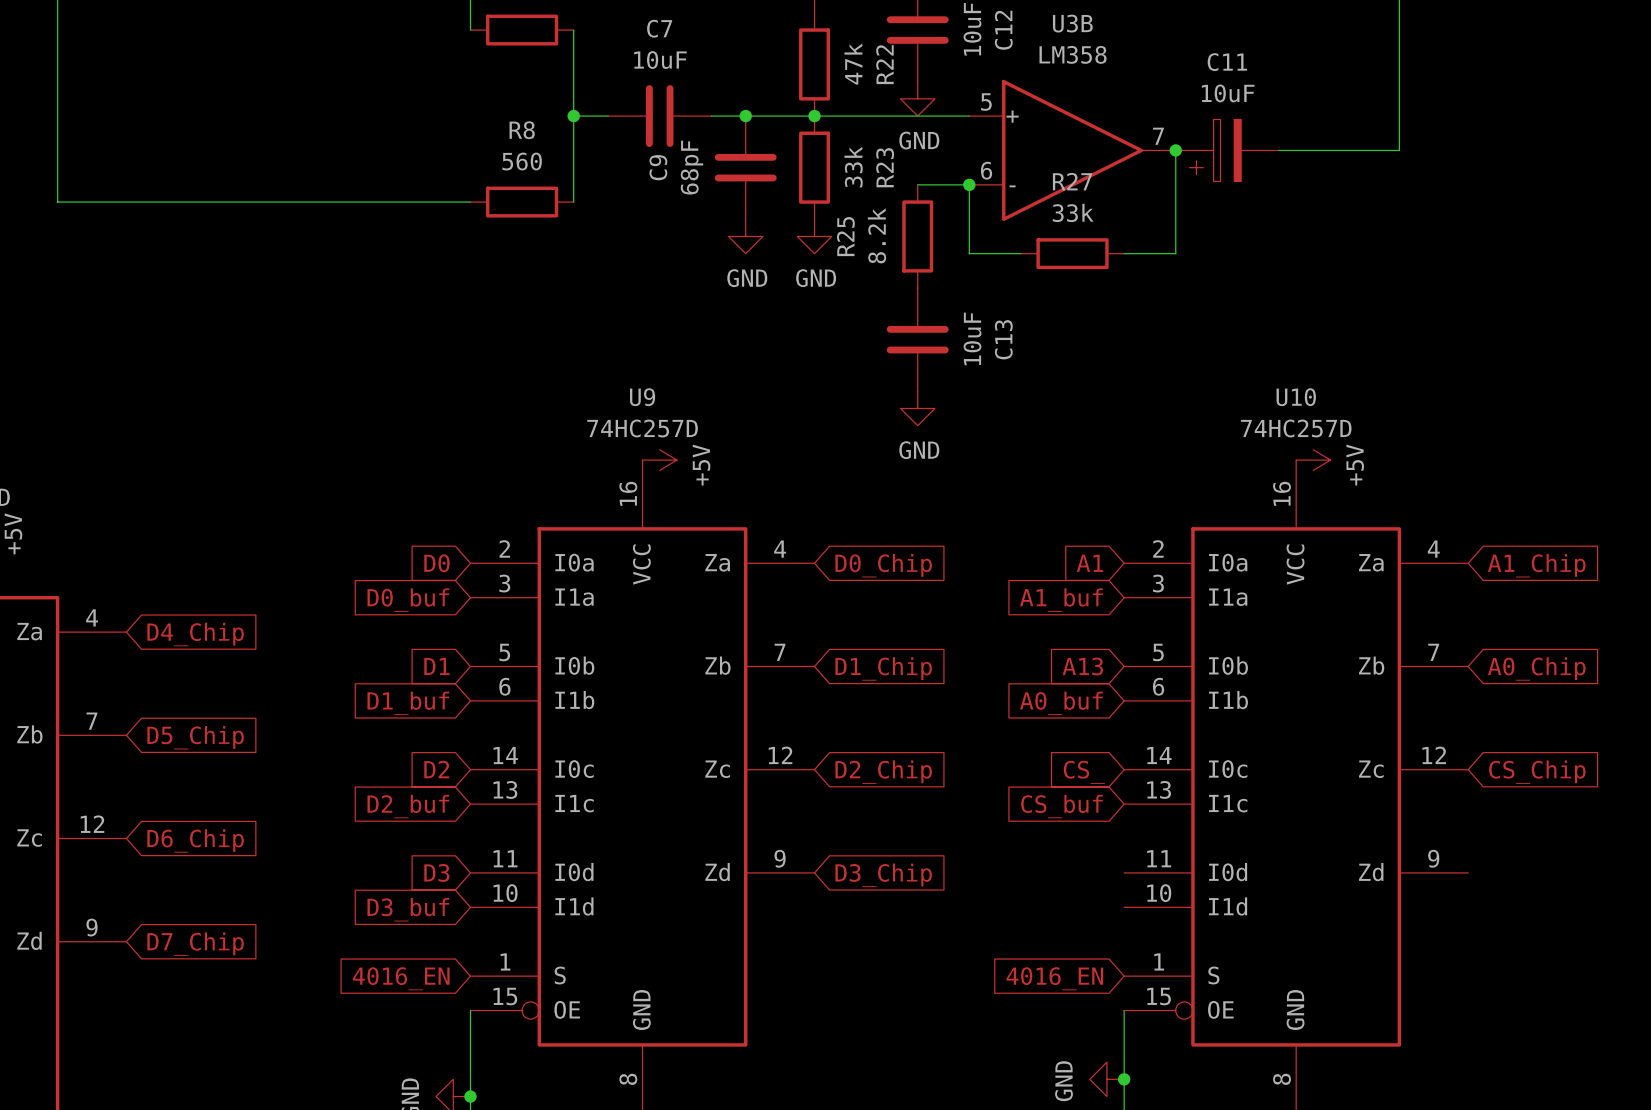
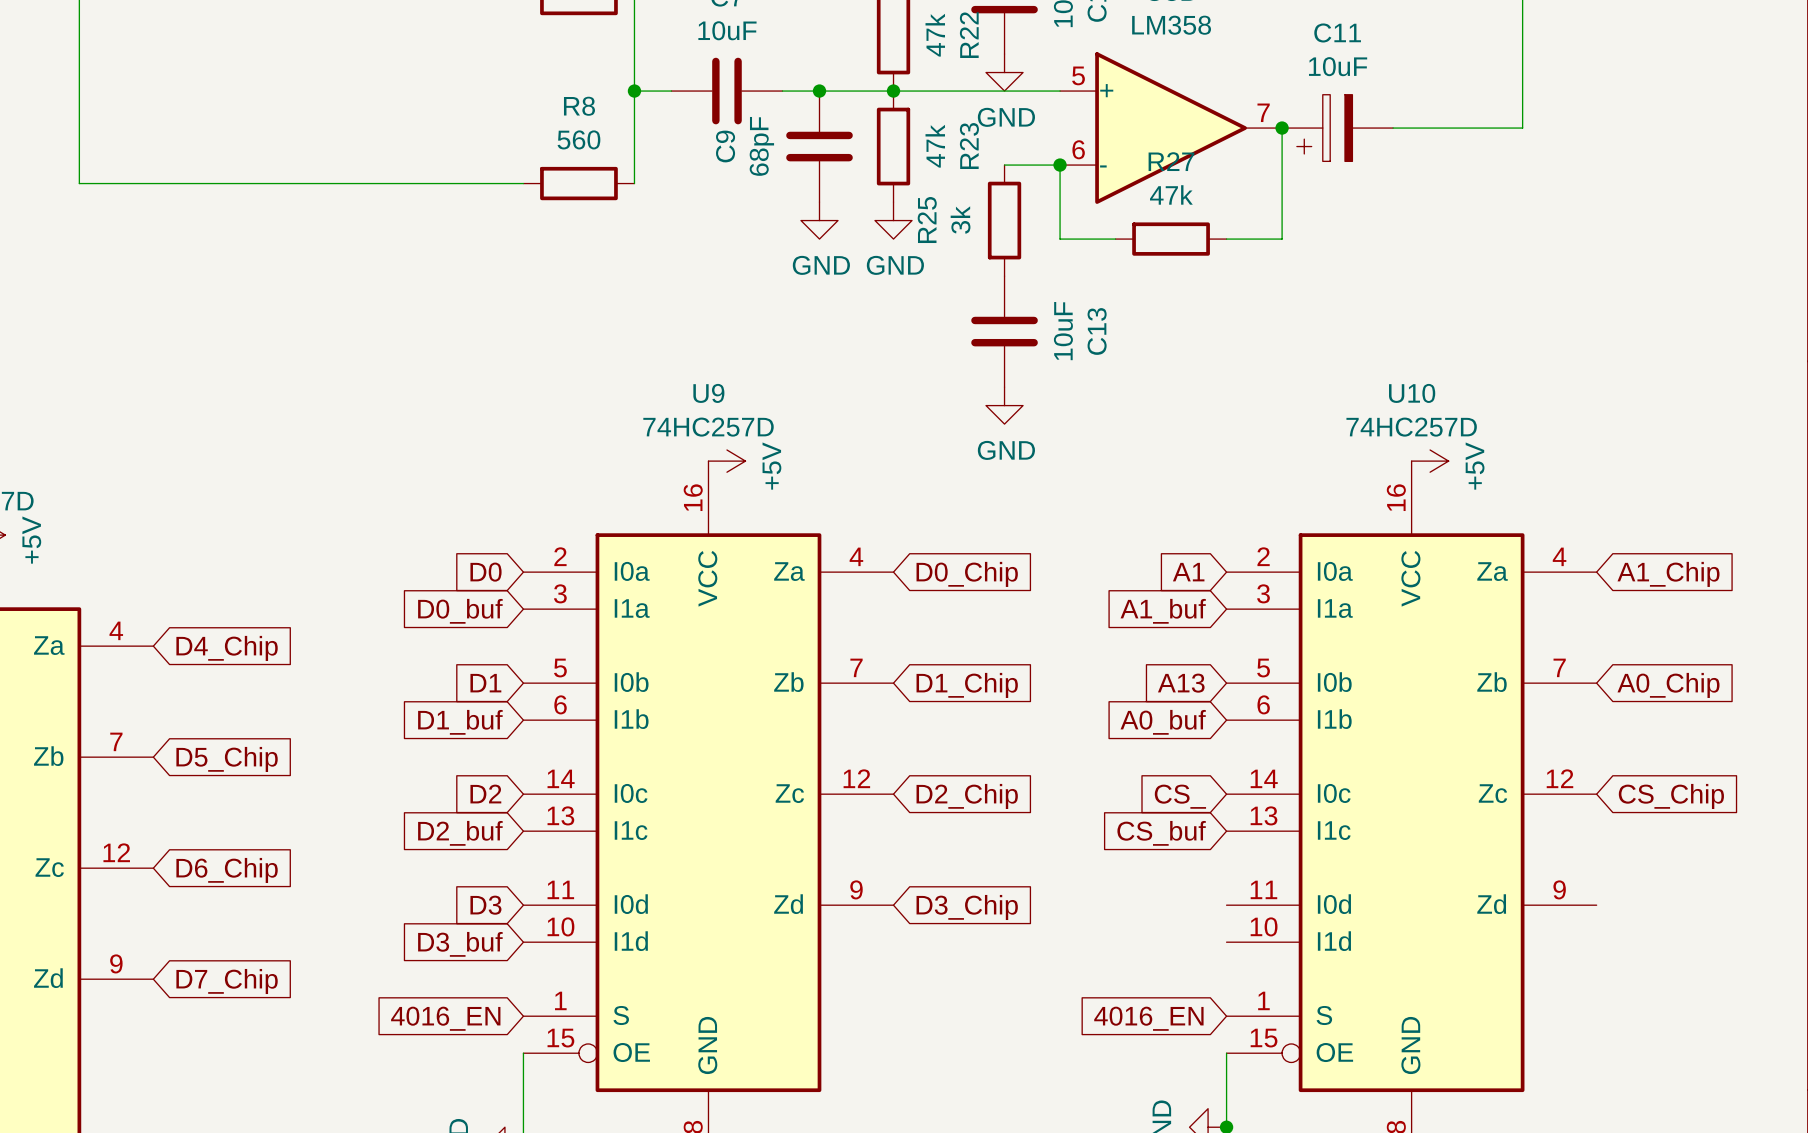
R23 value: 33k (853, 167) -> 47k (935, 146)
R27 value: 33k (1073, 212) -> 47k (1171, 194)
R25 value: 8.2k (876, 235) -> 3k (960, 220)

